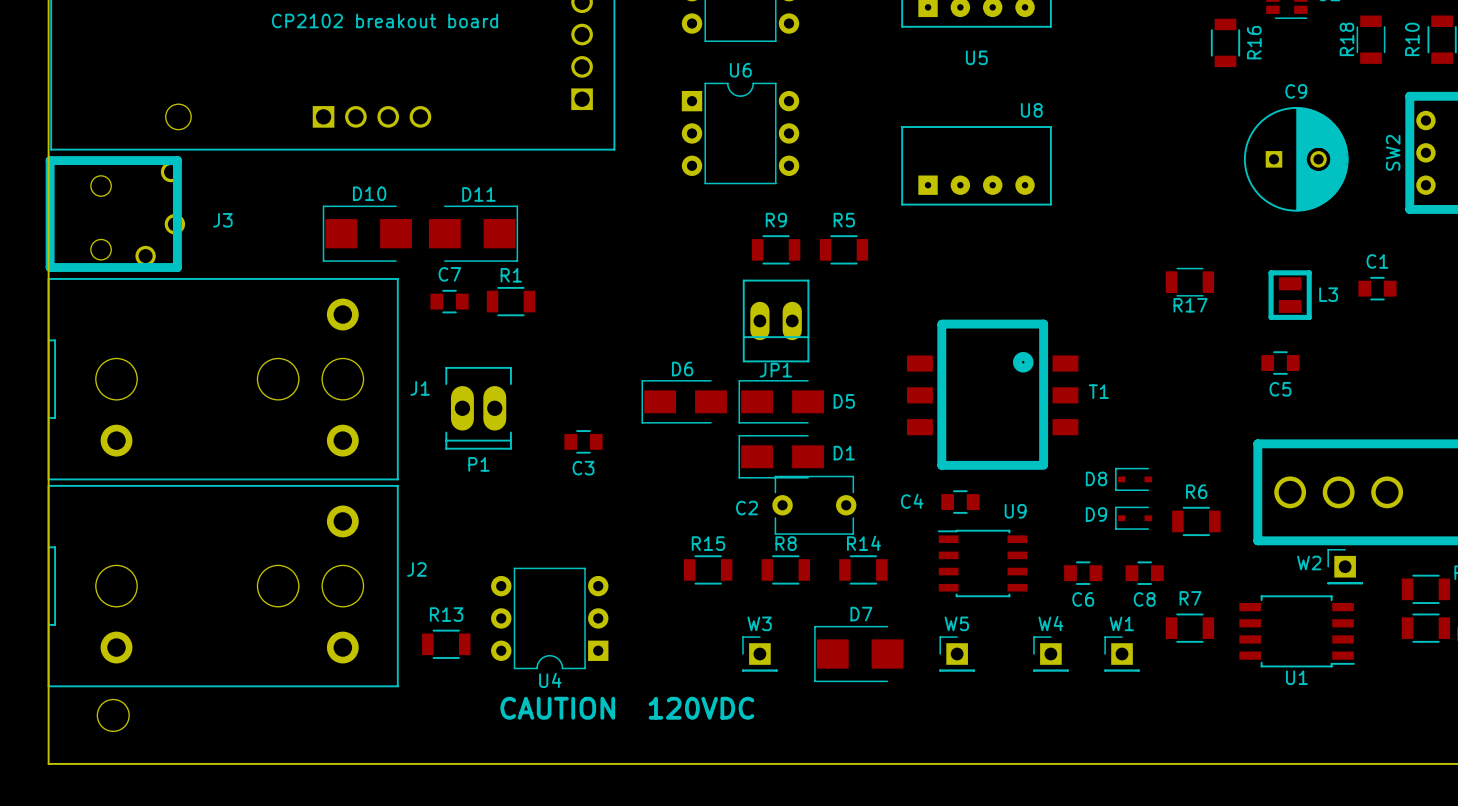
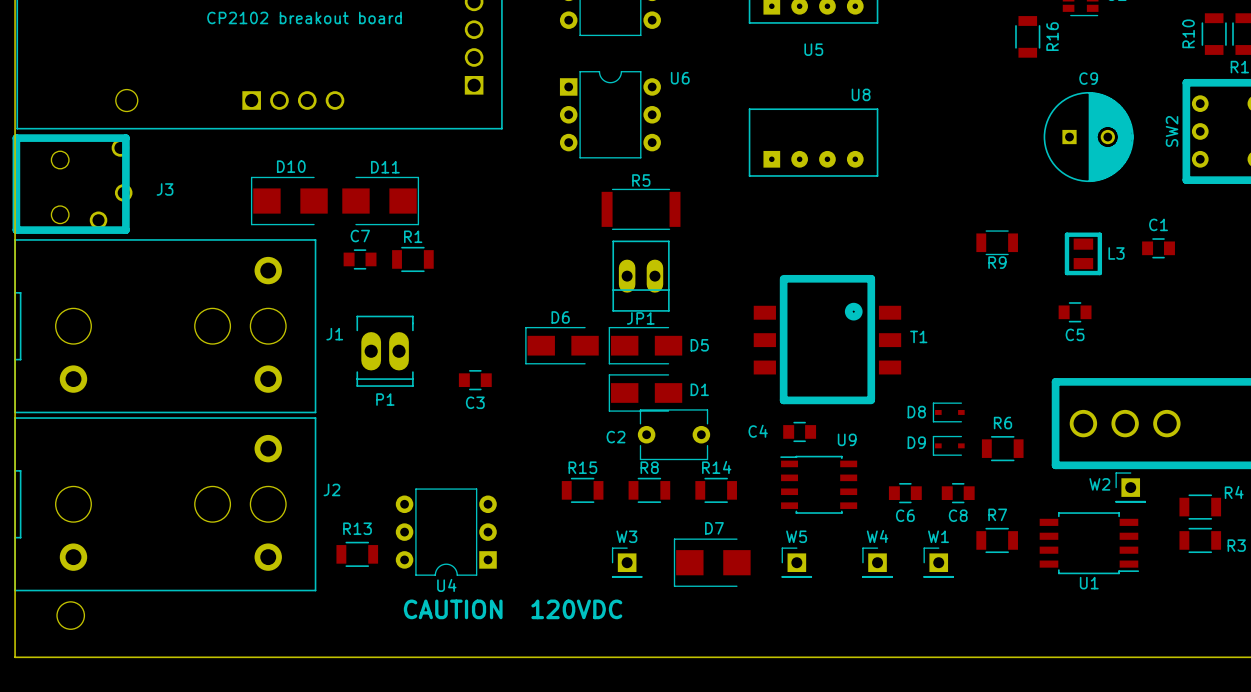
R18: (1370, 39) -> none
U6 name position: U6 (740, 70) -> U6 (680, 78)
R5 footprint: [819, 235, 869, 265] -> [601, 188, 681, 230]
R9: (776, 249) -> none
R17 name: R17 (1190, 305) -> R9 (997, 262)

